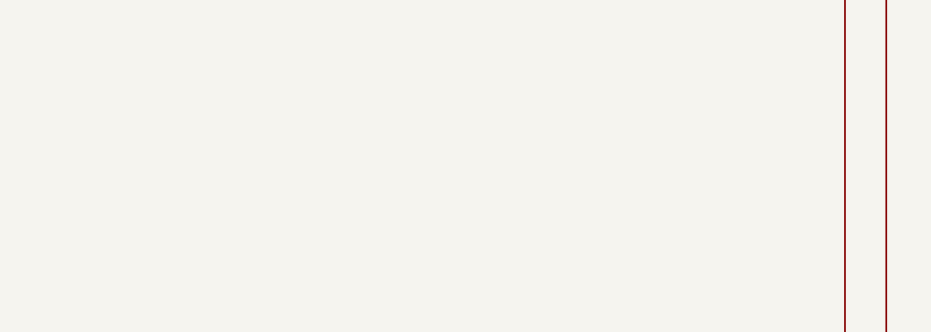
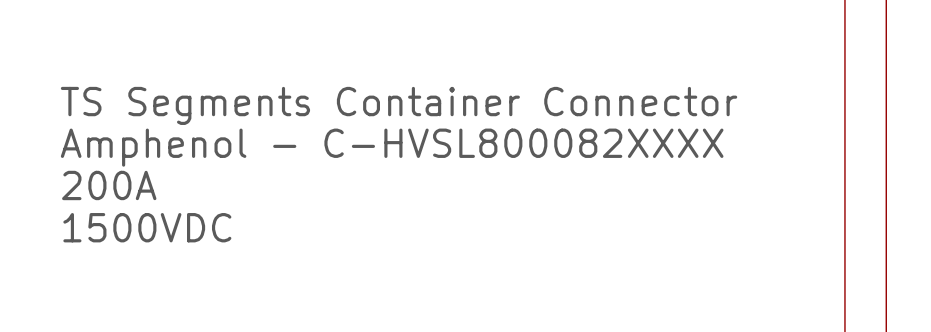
text: none -> TS Segments Container Connector (399, 105)
text: none -> Amphenol - C-HVSL800082XXXX (392, 147)
text: none -> 200A (109, 185)
text: none -> 1500VDC (147, 227)

